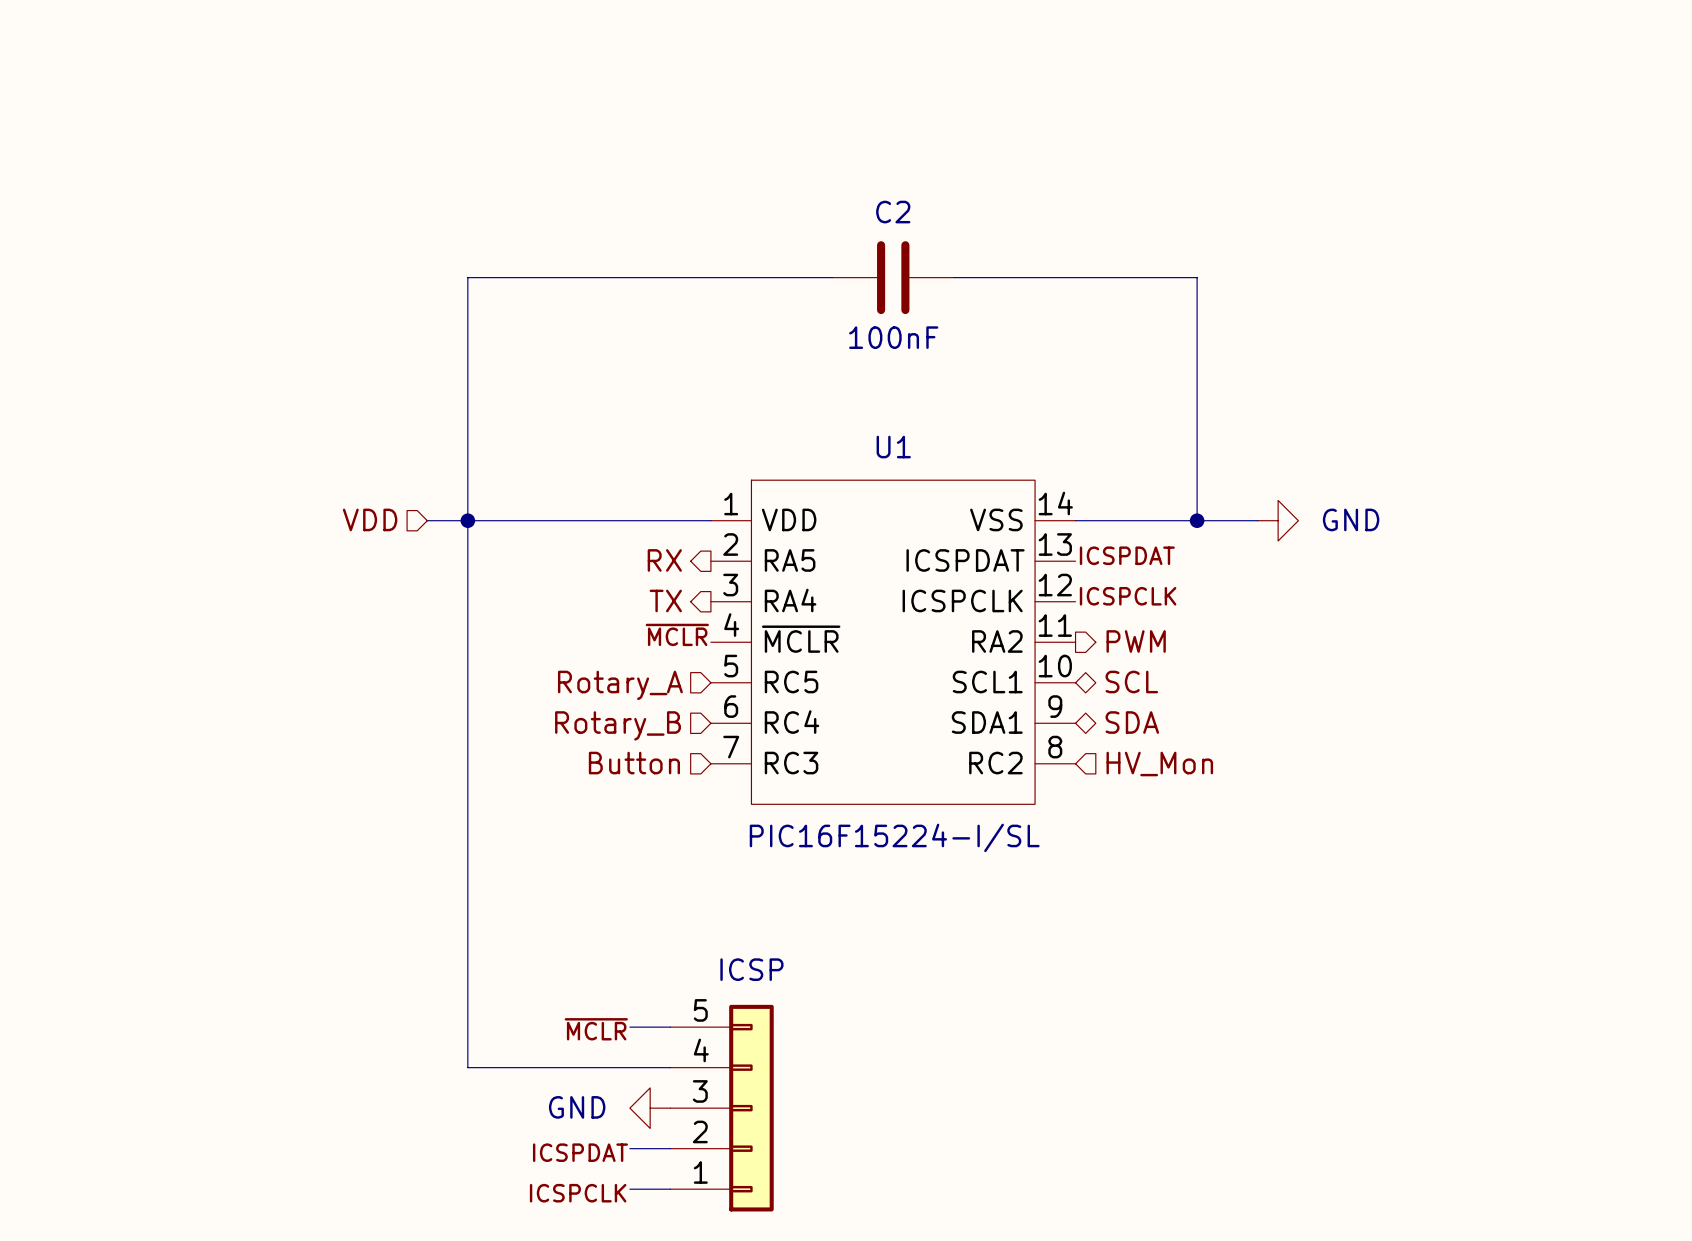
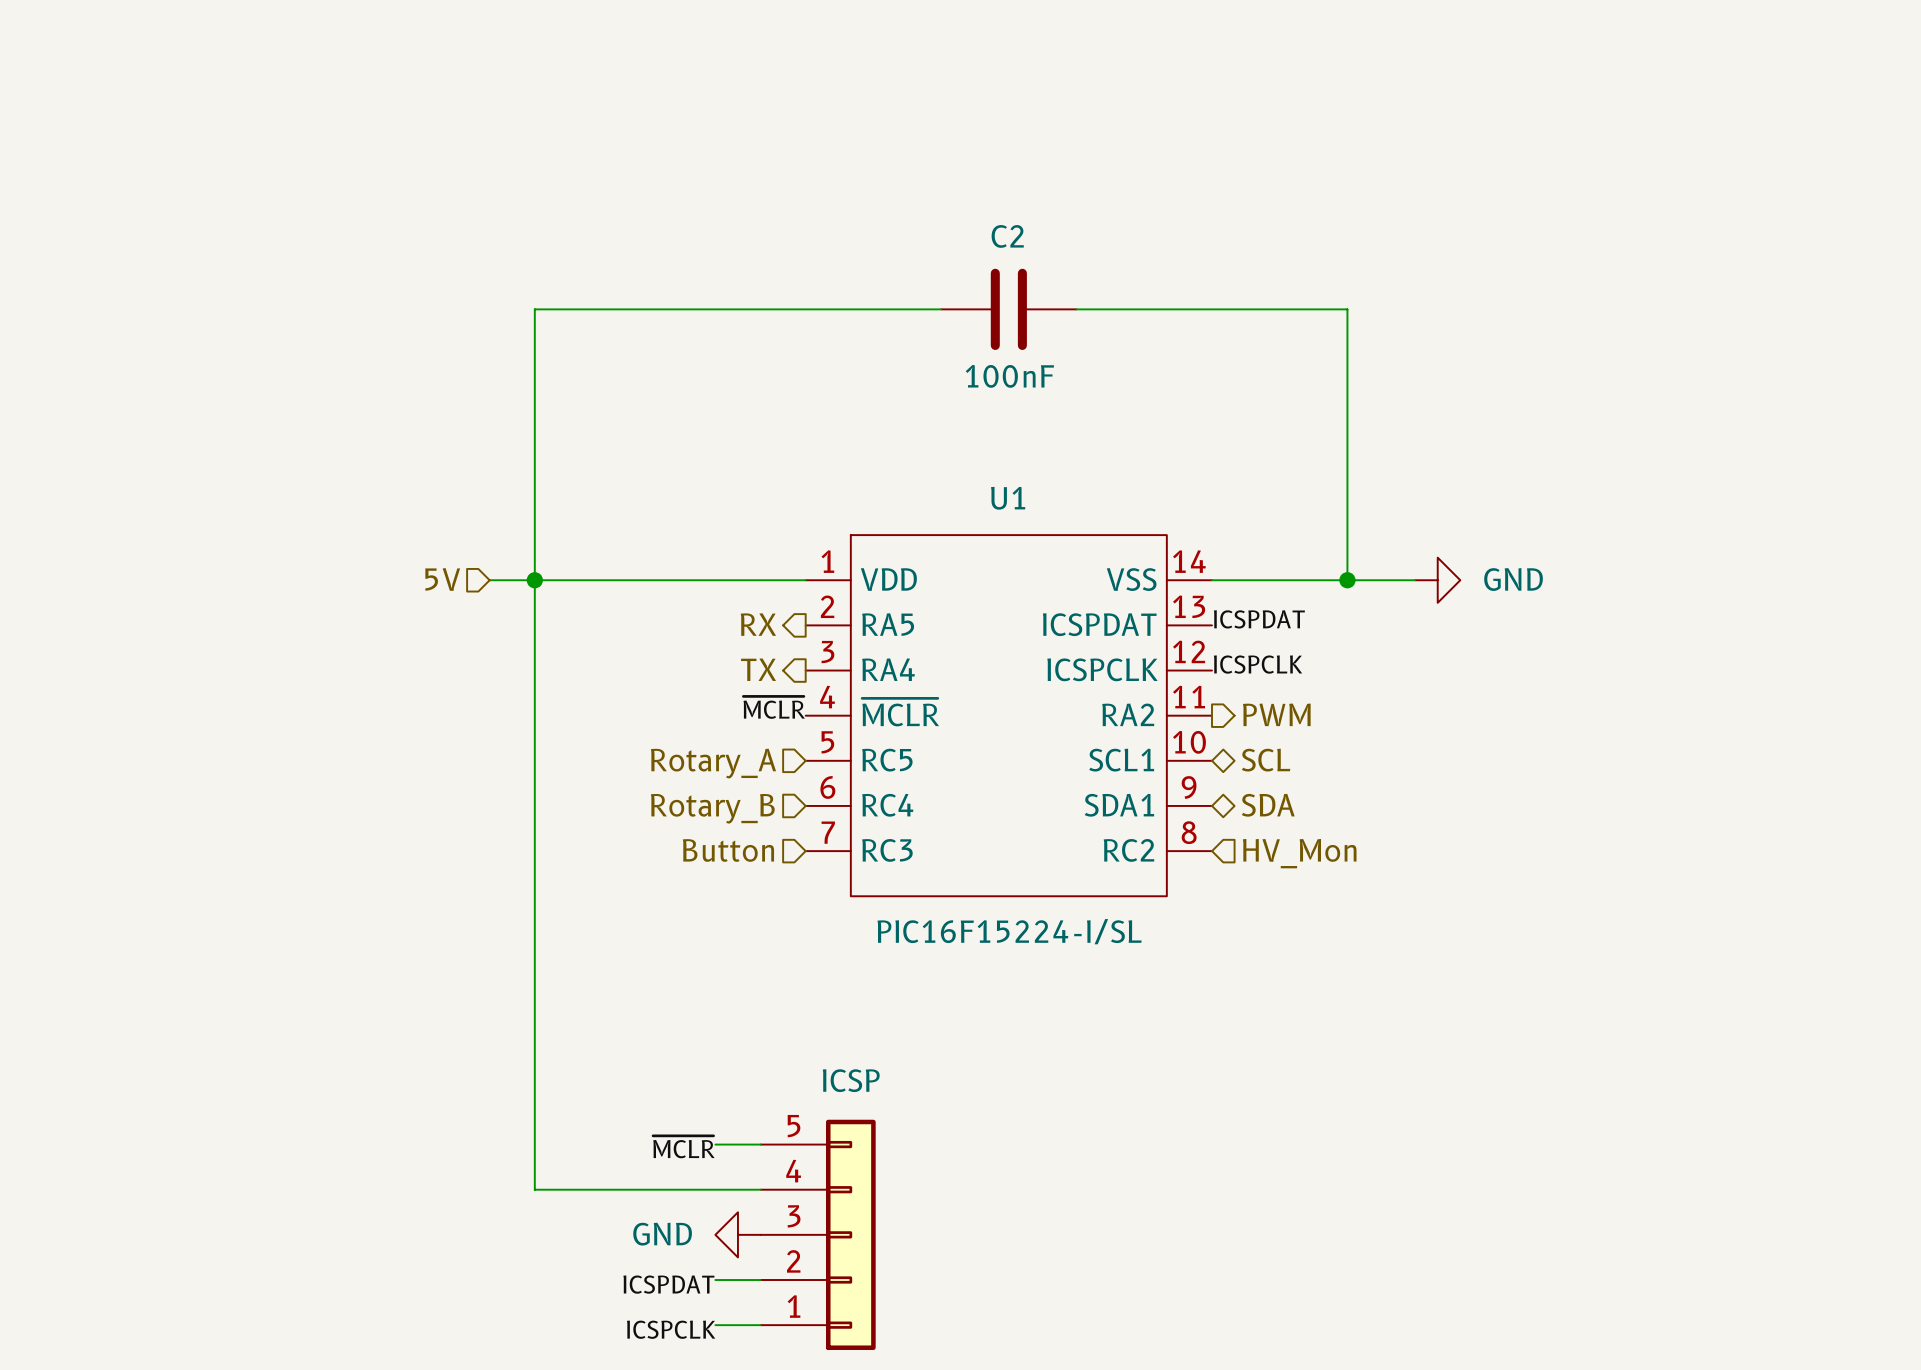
hierarchical label: VDD (370, 519) -> 5V (442, 579)

